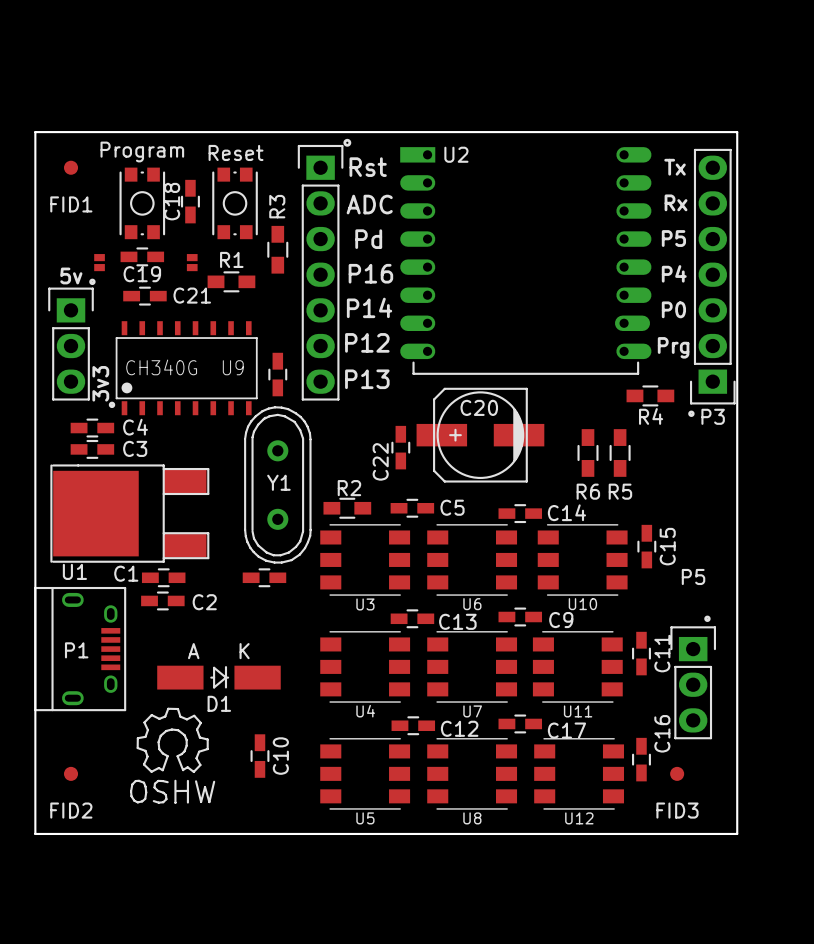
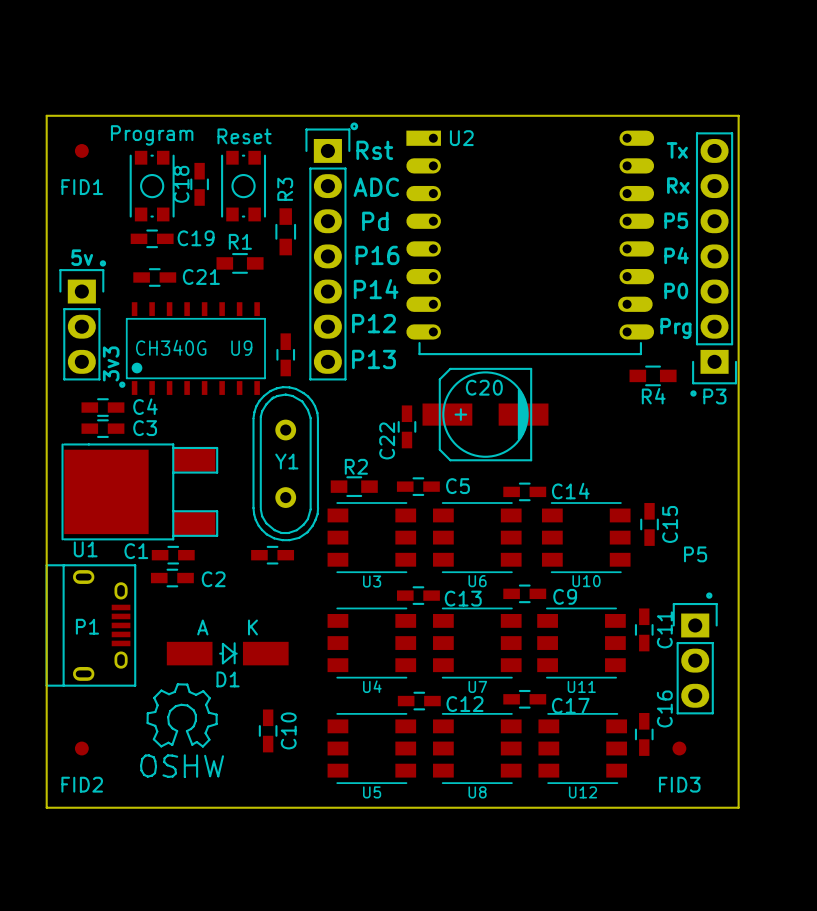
part: (99, 262) -> none
part: (192, 262) -> none
C19 name position: C19 (142, 274) -> C19 (196, 238)
R6: (588, 452) -> none
R5: (620, 452) -> none

